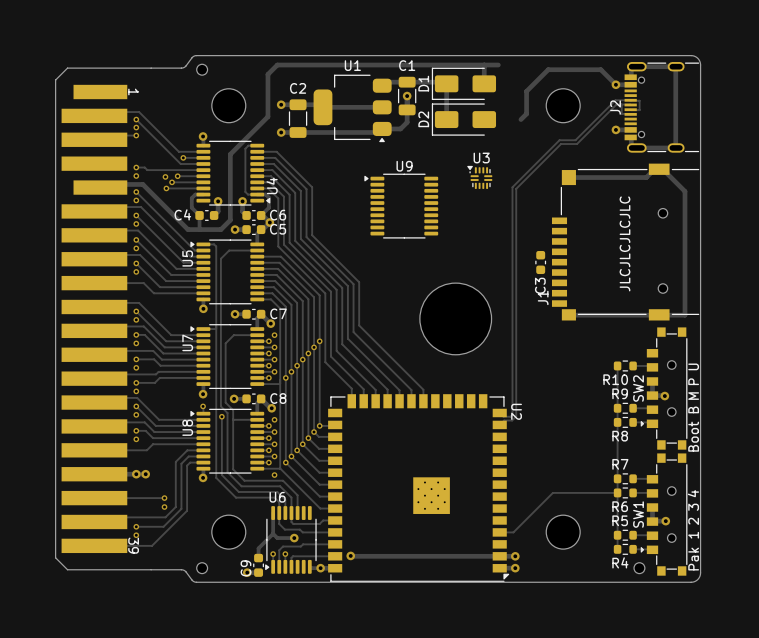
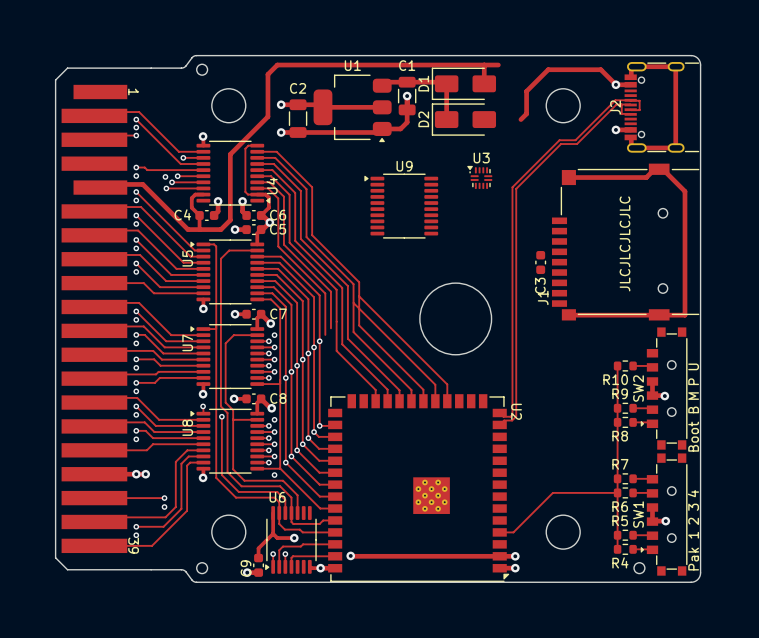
track: none -> (359, 296) (447, 384) (447, 401)
track: none -> (353, 302) (435, 384) (435, 401)
track: (330, 328) (330, 356) (363, 389) (363, 401) -> none
track: (325, 334) (325, 362) (351, 388) (351, 401) -> none

